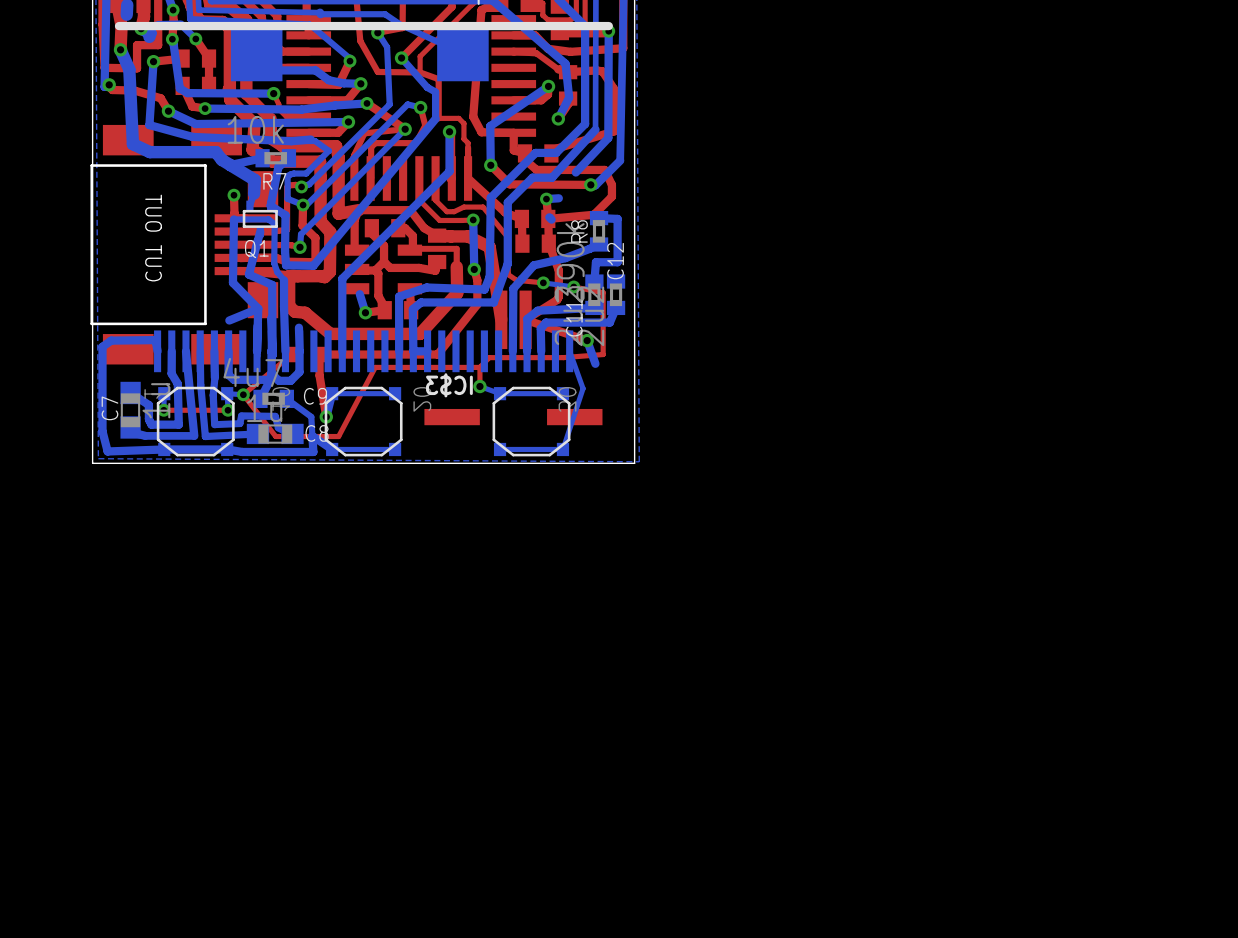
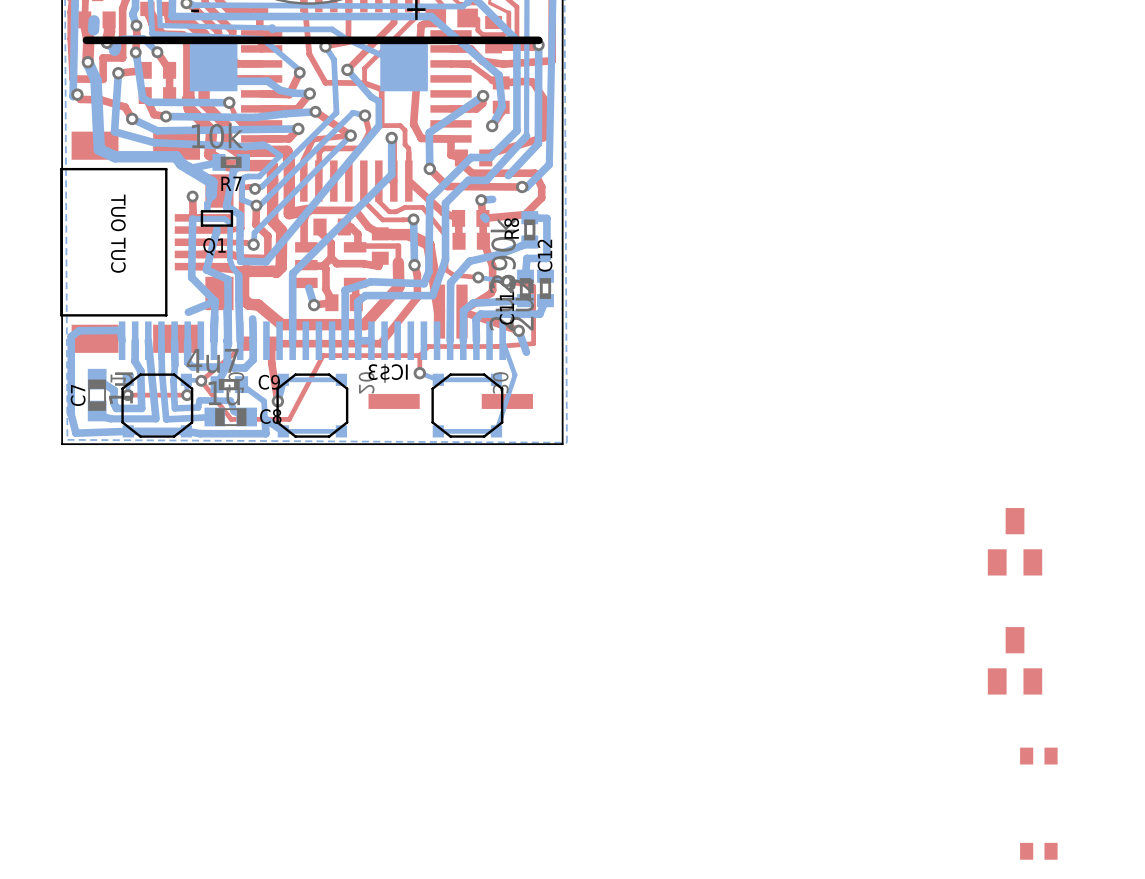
part: none -> (1015, 541)
part: none -> (1015, 660)
part: none -> (1038, 756)
part: none -> (1038, 851)

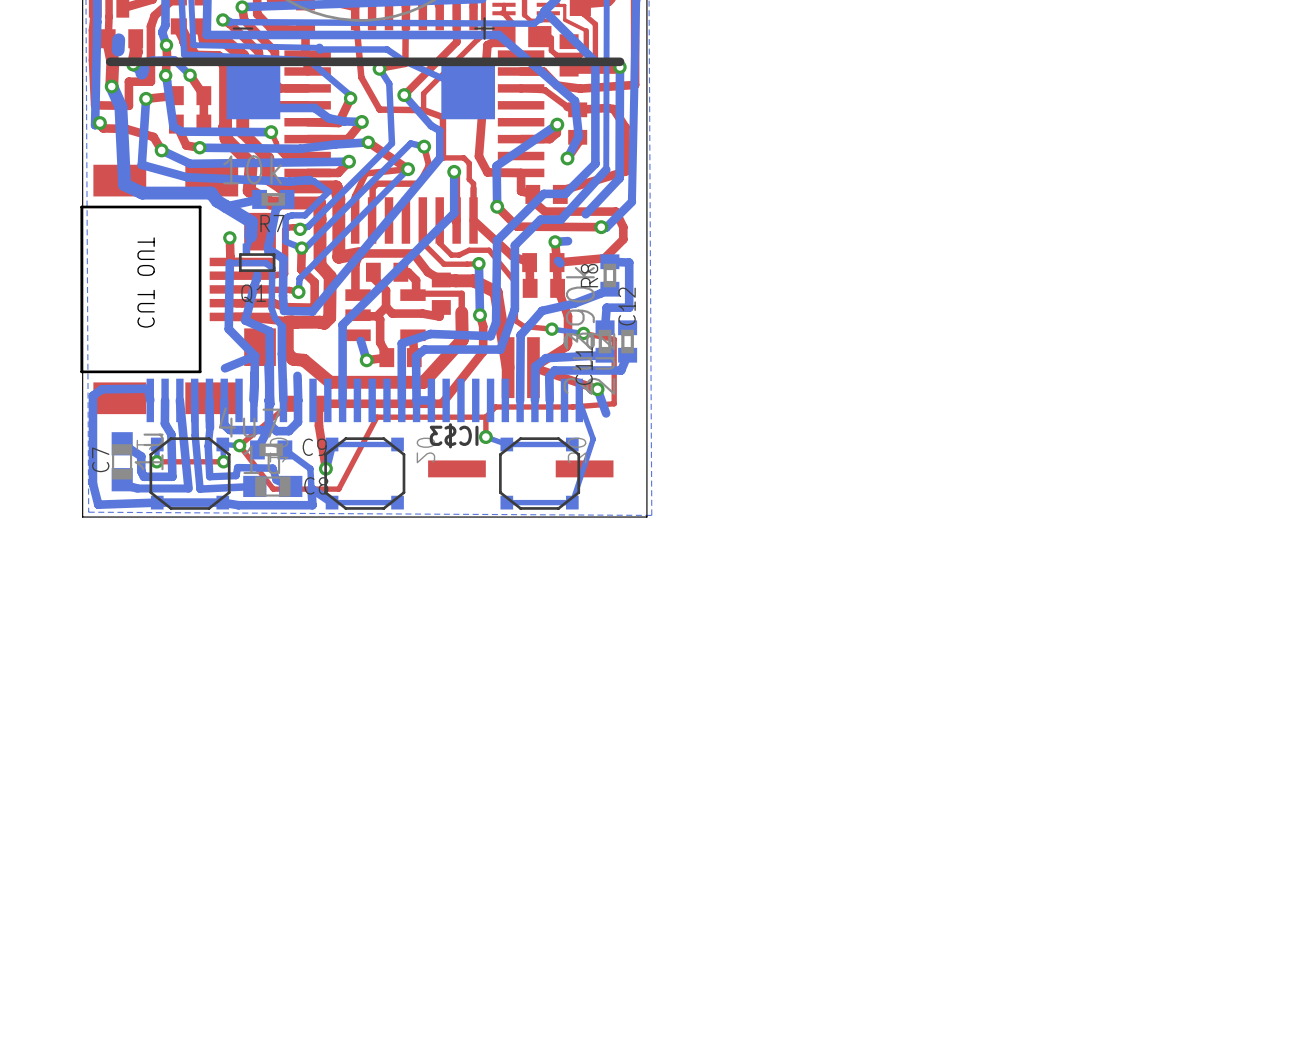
part: (1015, 541) -> none
part: (1015, 660) -> none
part: (1038, 756) -> none
part: (1038, 851) -> none

